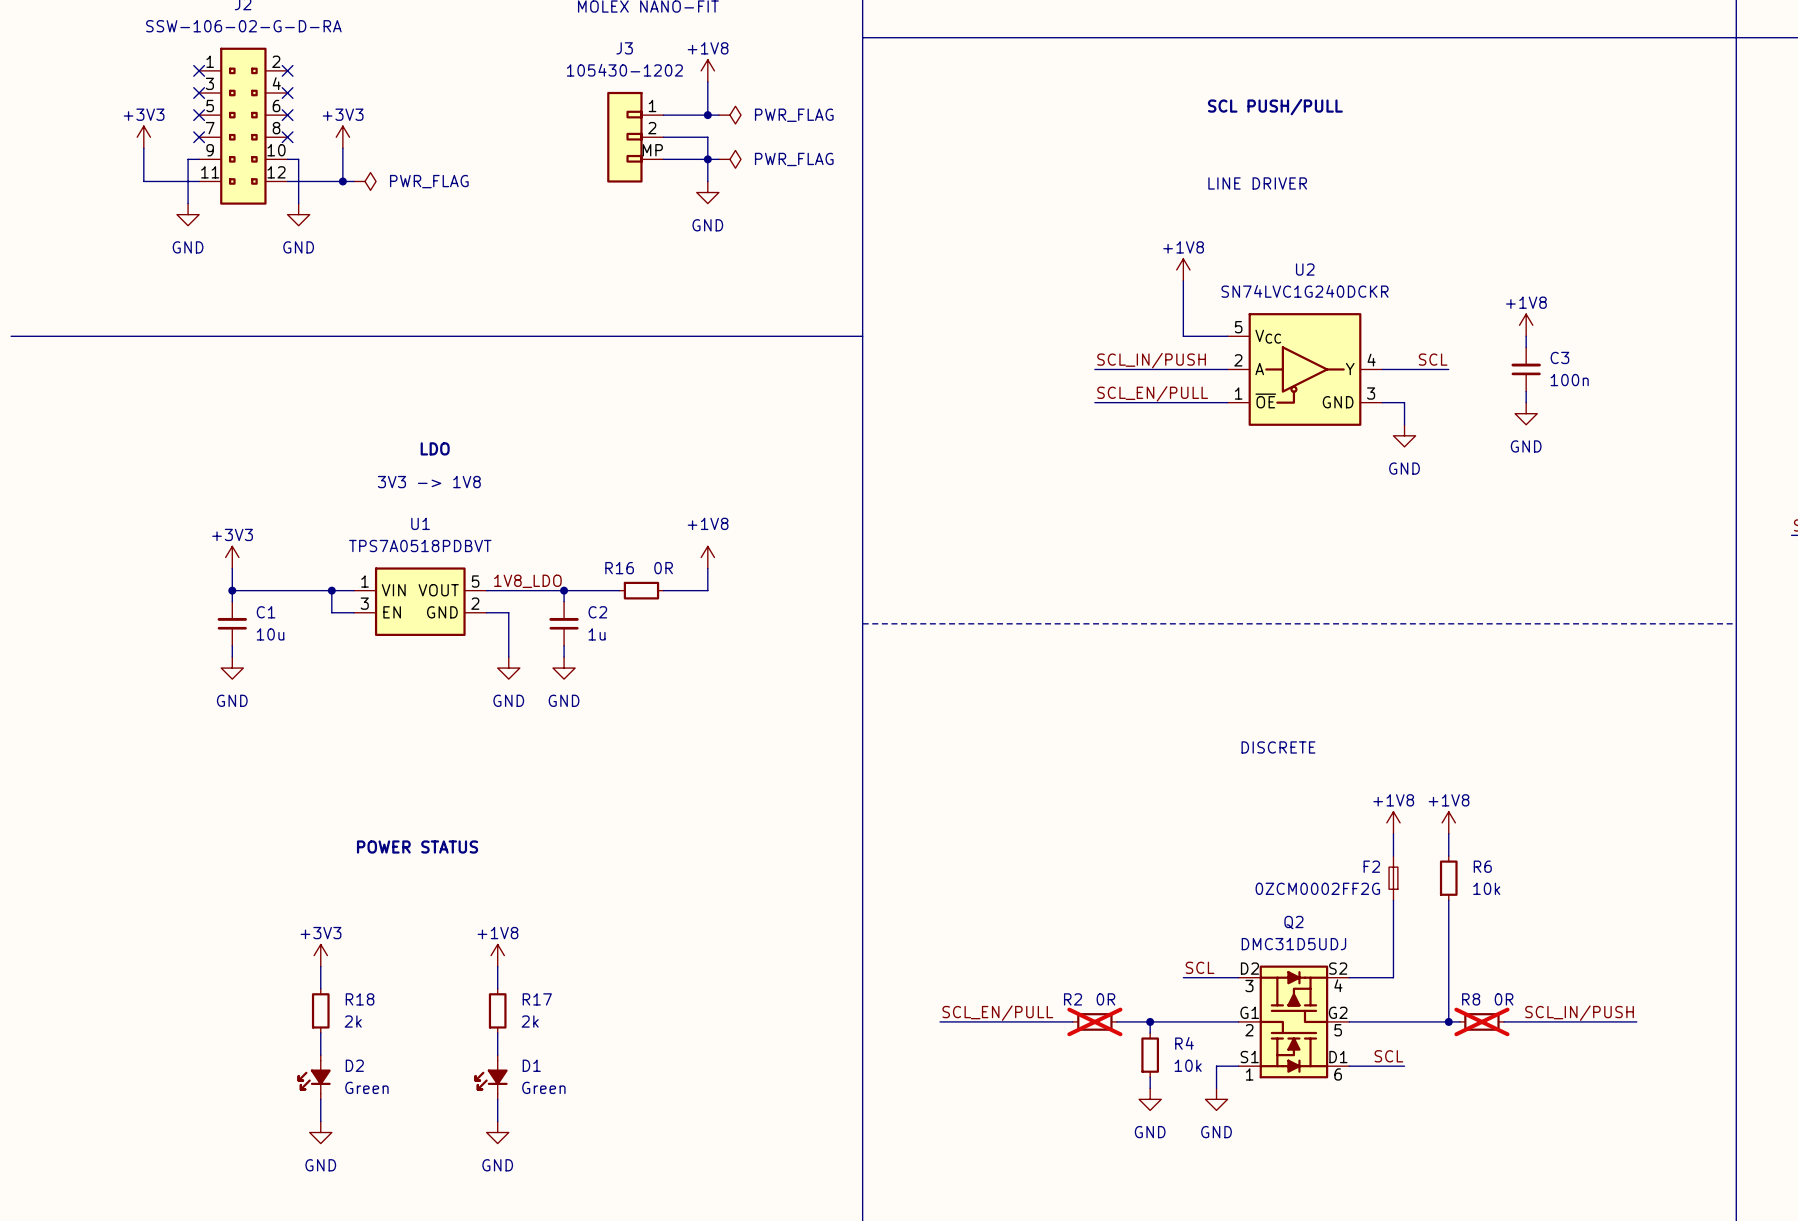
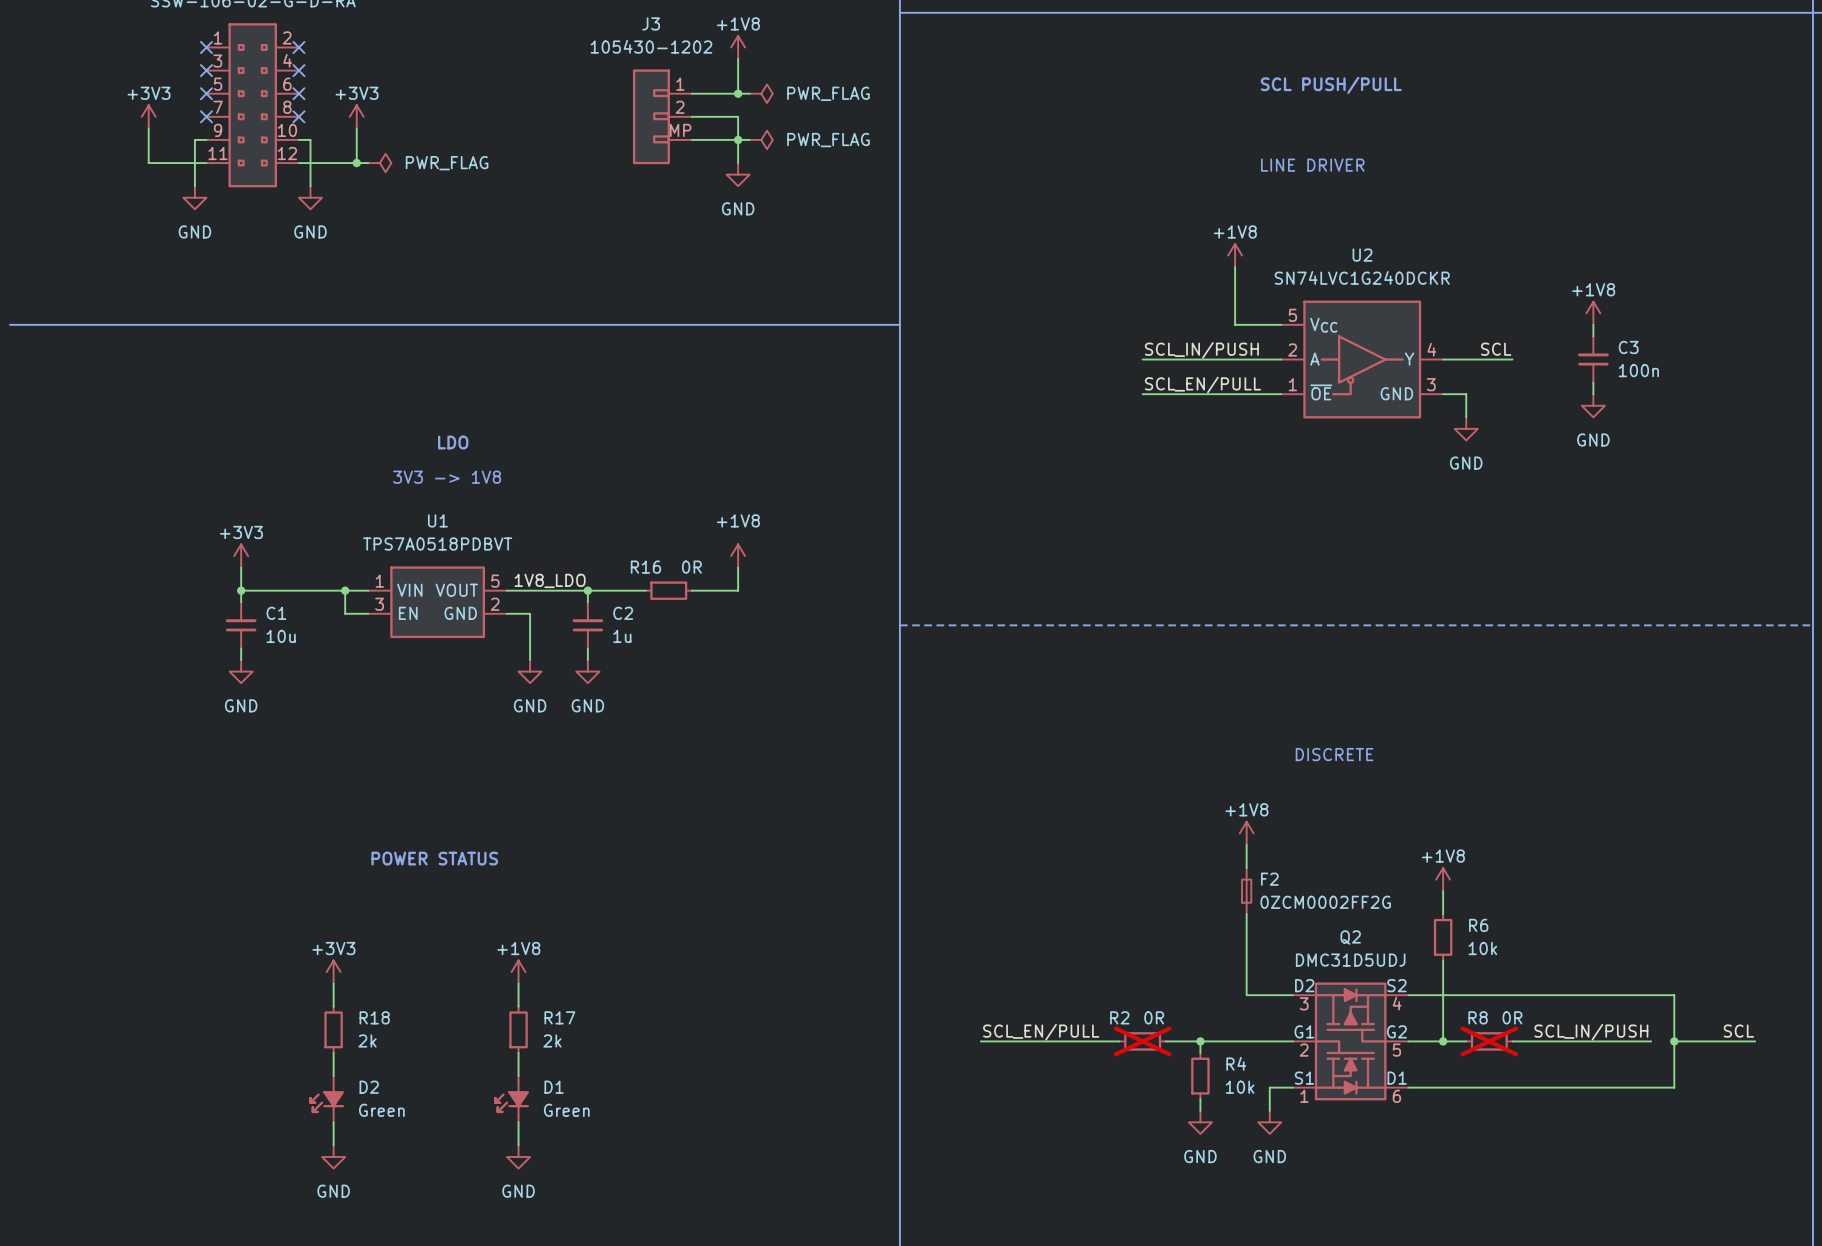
power symbol: none -> +1V8 (1246, 833)
power symbol: +1V8 (1393, 822) -> none
power symbol: +1V8 (1448, 822) -> none
wire: none -> (1246, 844) (1246, 868)
wire: (1393, 833) (1393, 856) -> (1443, 891) (1443, 914)
wire: (1448, 833) (1448, 856) -> none
F2 name position: F2 (1371, 866) -> F2 (1269, 879)
power symbol: none -> +1V8 (1443, 879)
F2 position: (1393, 878) -> (1246, 891)
R6 position: (1448, 878) -> (1443, 937)
F2 text position: 0ZCM0002FF2G (1317, 888) -> 0ZCM0002FF2G (1325, 902)
wire: (1393, 900) (1393, 977) -> (1466, 1087) (1674, 1087) (1674, 995) (1454, 995)
wire: (1448, 900) (1448, 1021) (1404, 1021) -> none
wire: none -> (1443, 960) (1443, 1041)
label: SCL (1200, 967) -> none
wire: (1183, 977) (1194, 977) -> (1246, 914) (1246, 995)
label: none -> SCL (1738, 1031)
label position: SCL_IN/PUSH (1579, 1013) -> SCL_IN/PUSH (1591, 1032)
junction: none -> (1443, 1041)
junction: (1448, 1021) -> none
R8 position: (1481, 1021) -> (1489, 1041)
wire: (1581, 1021) (1603, 1021) -> none
junction: none -> (1674, 1041)
wire: none -> (1708, 1041) (1755, 1041)
label: SCL (1388, 1056) -> none

